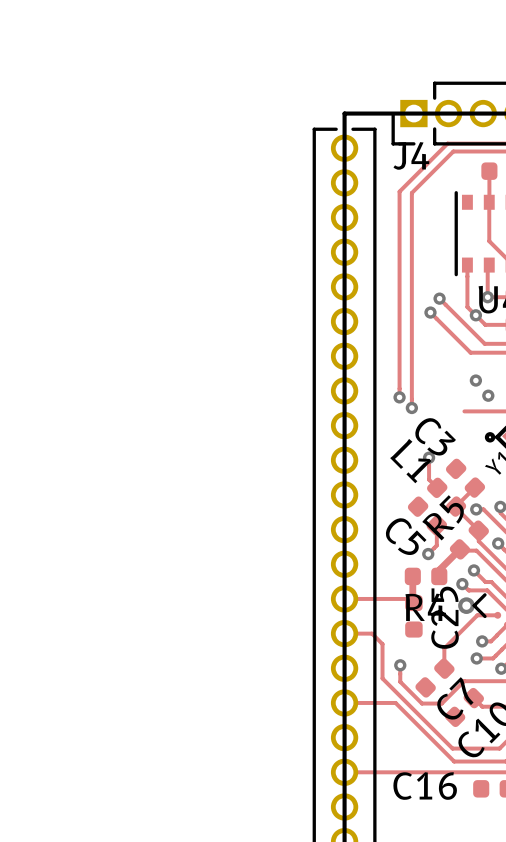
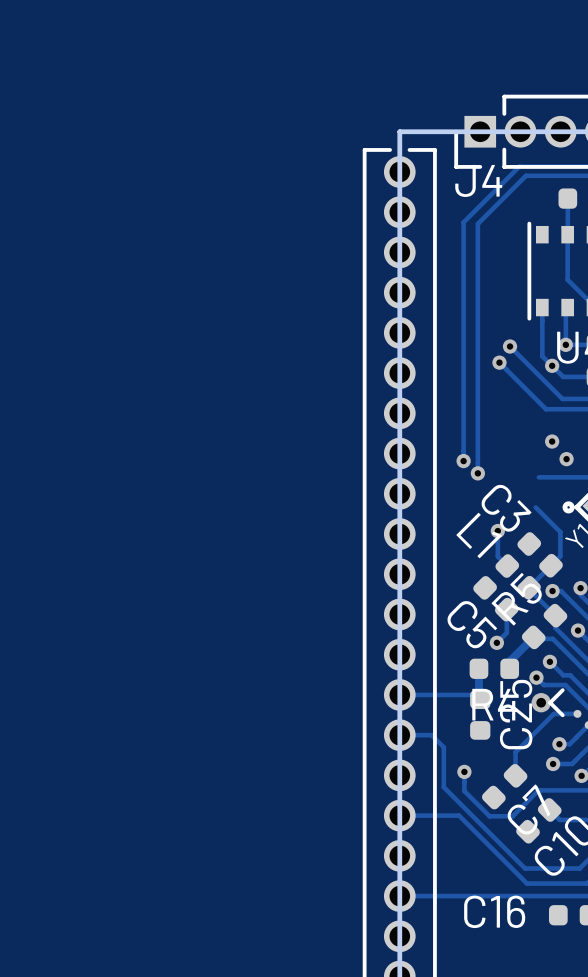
track: none -> (535, 507) (560, 532) (560, 556) (550, 565)

